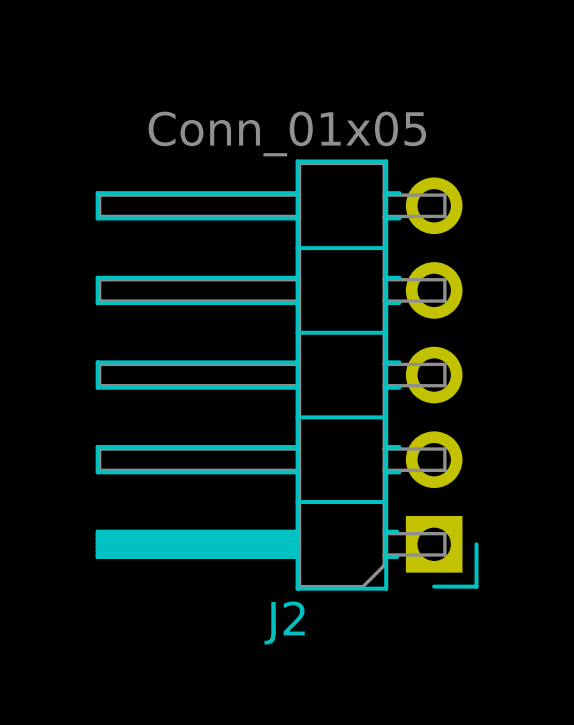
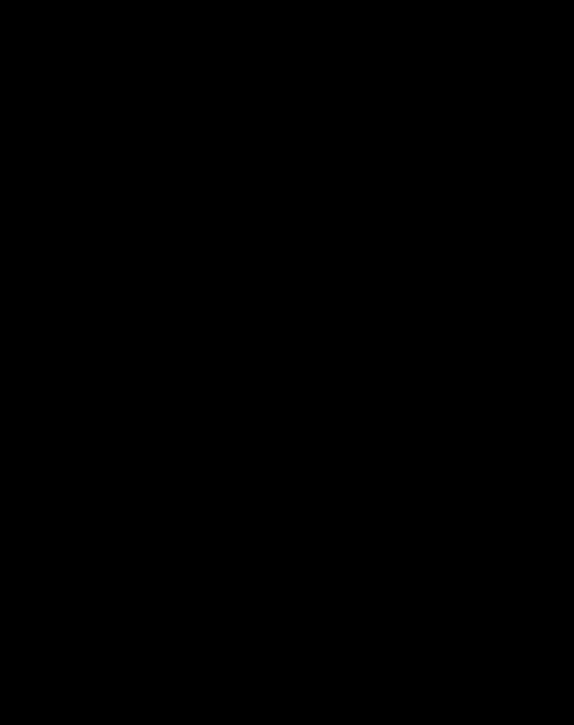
J2: Conn_01x05 (287, 375) -> none

